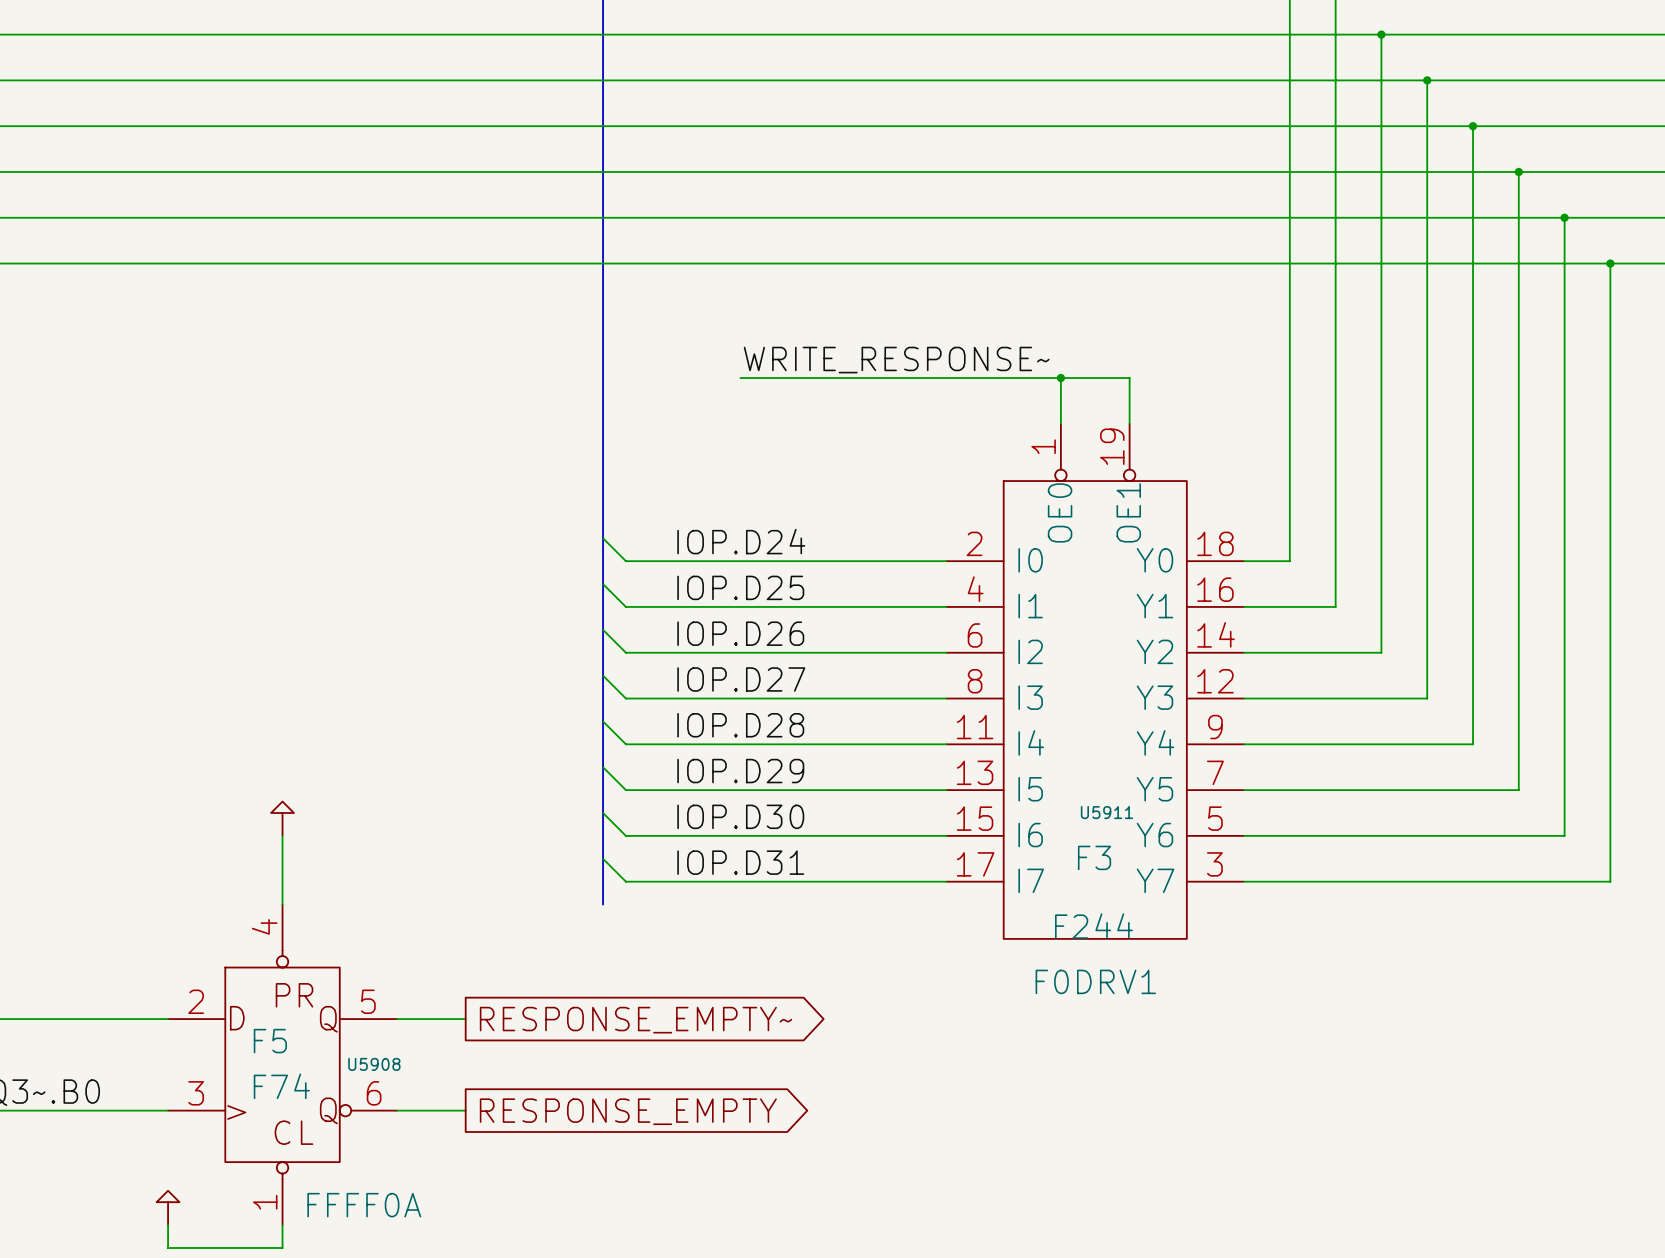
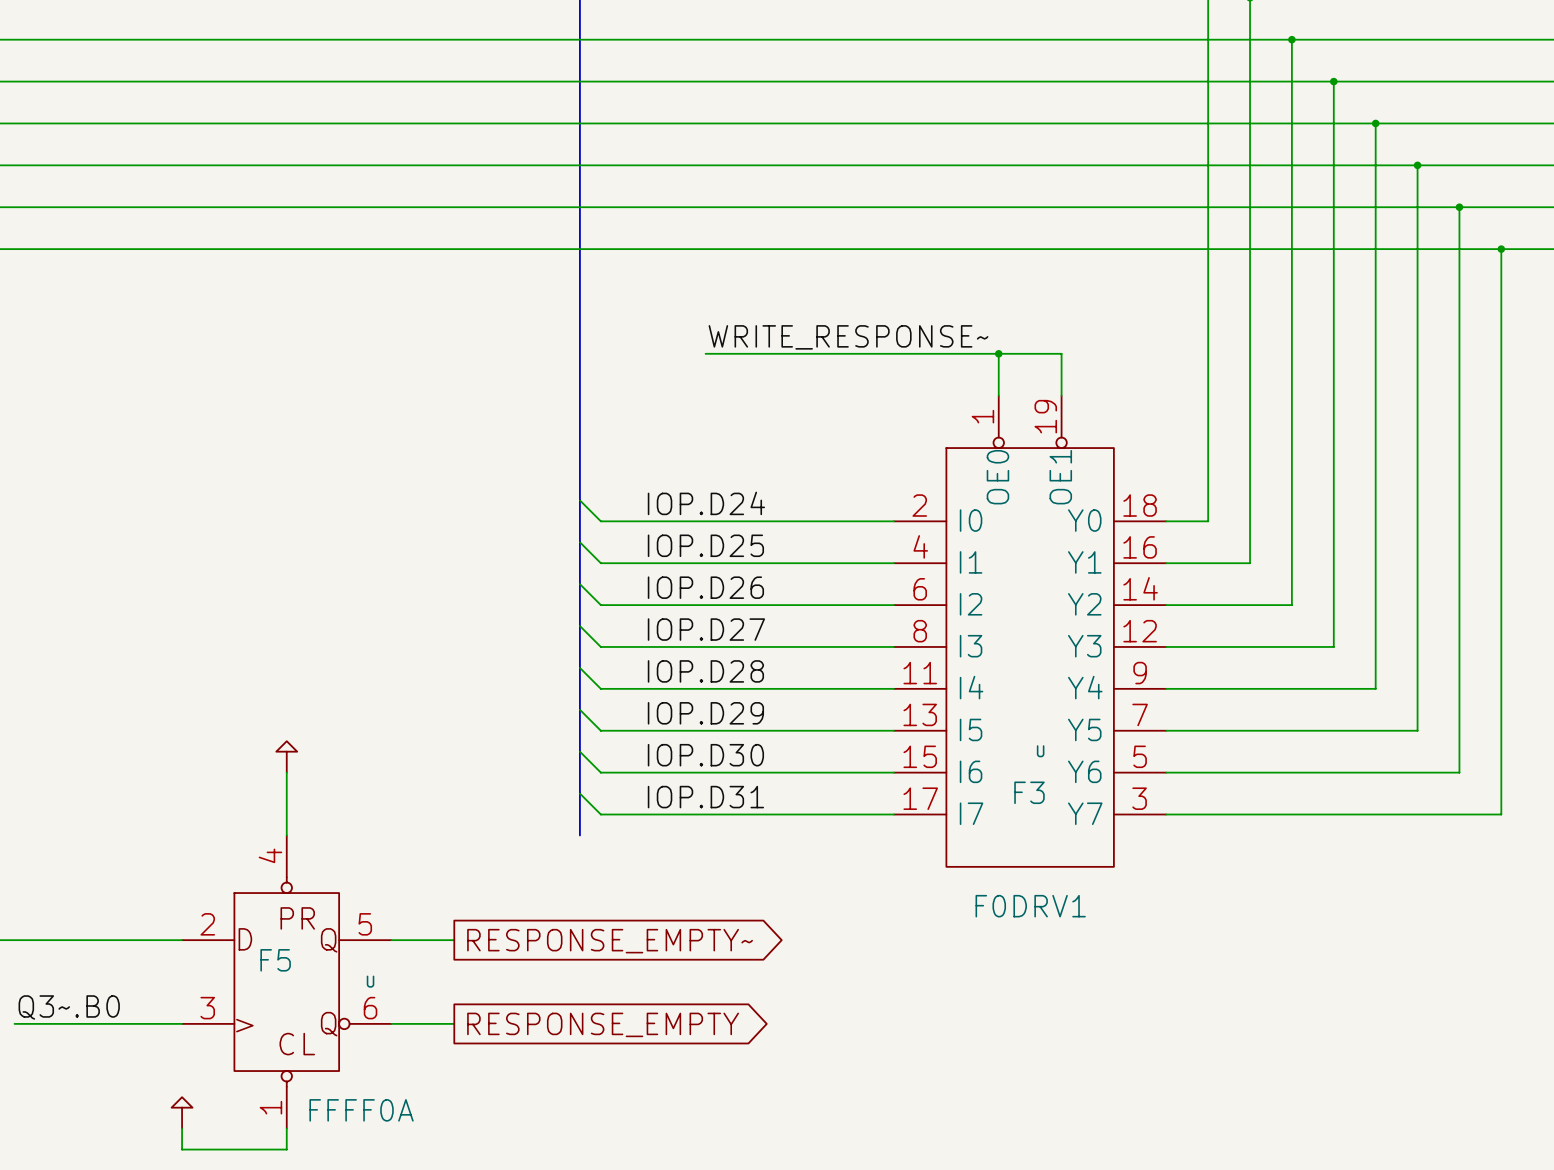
U5911 name: U5911 (1106, 812) -> U (1040, 751)
U5911 value: F244 (1093, 926) -> none
U5908 name: U5908 (374, 1064) -> U (370, 981)
U5908 value: F74 (281, 1086) -> none

